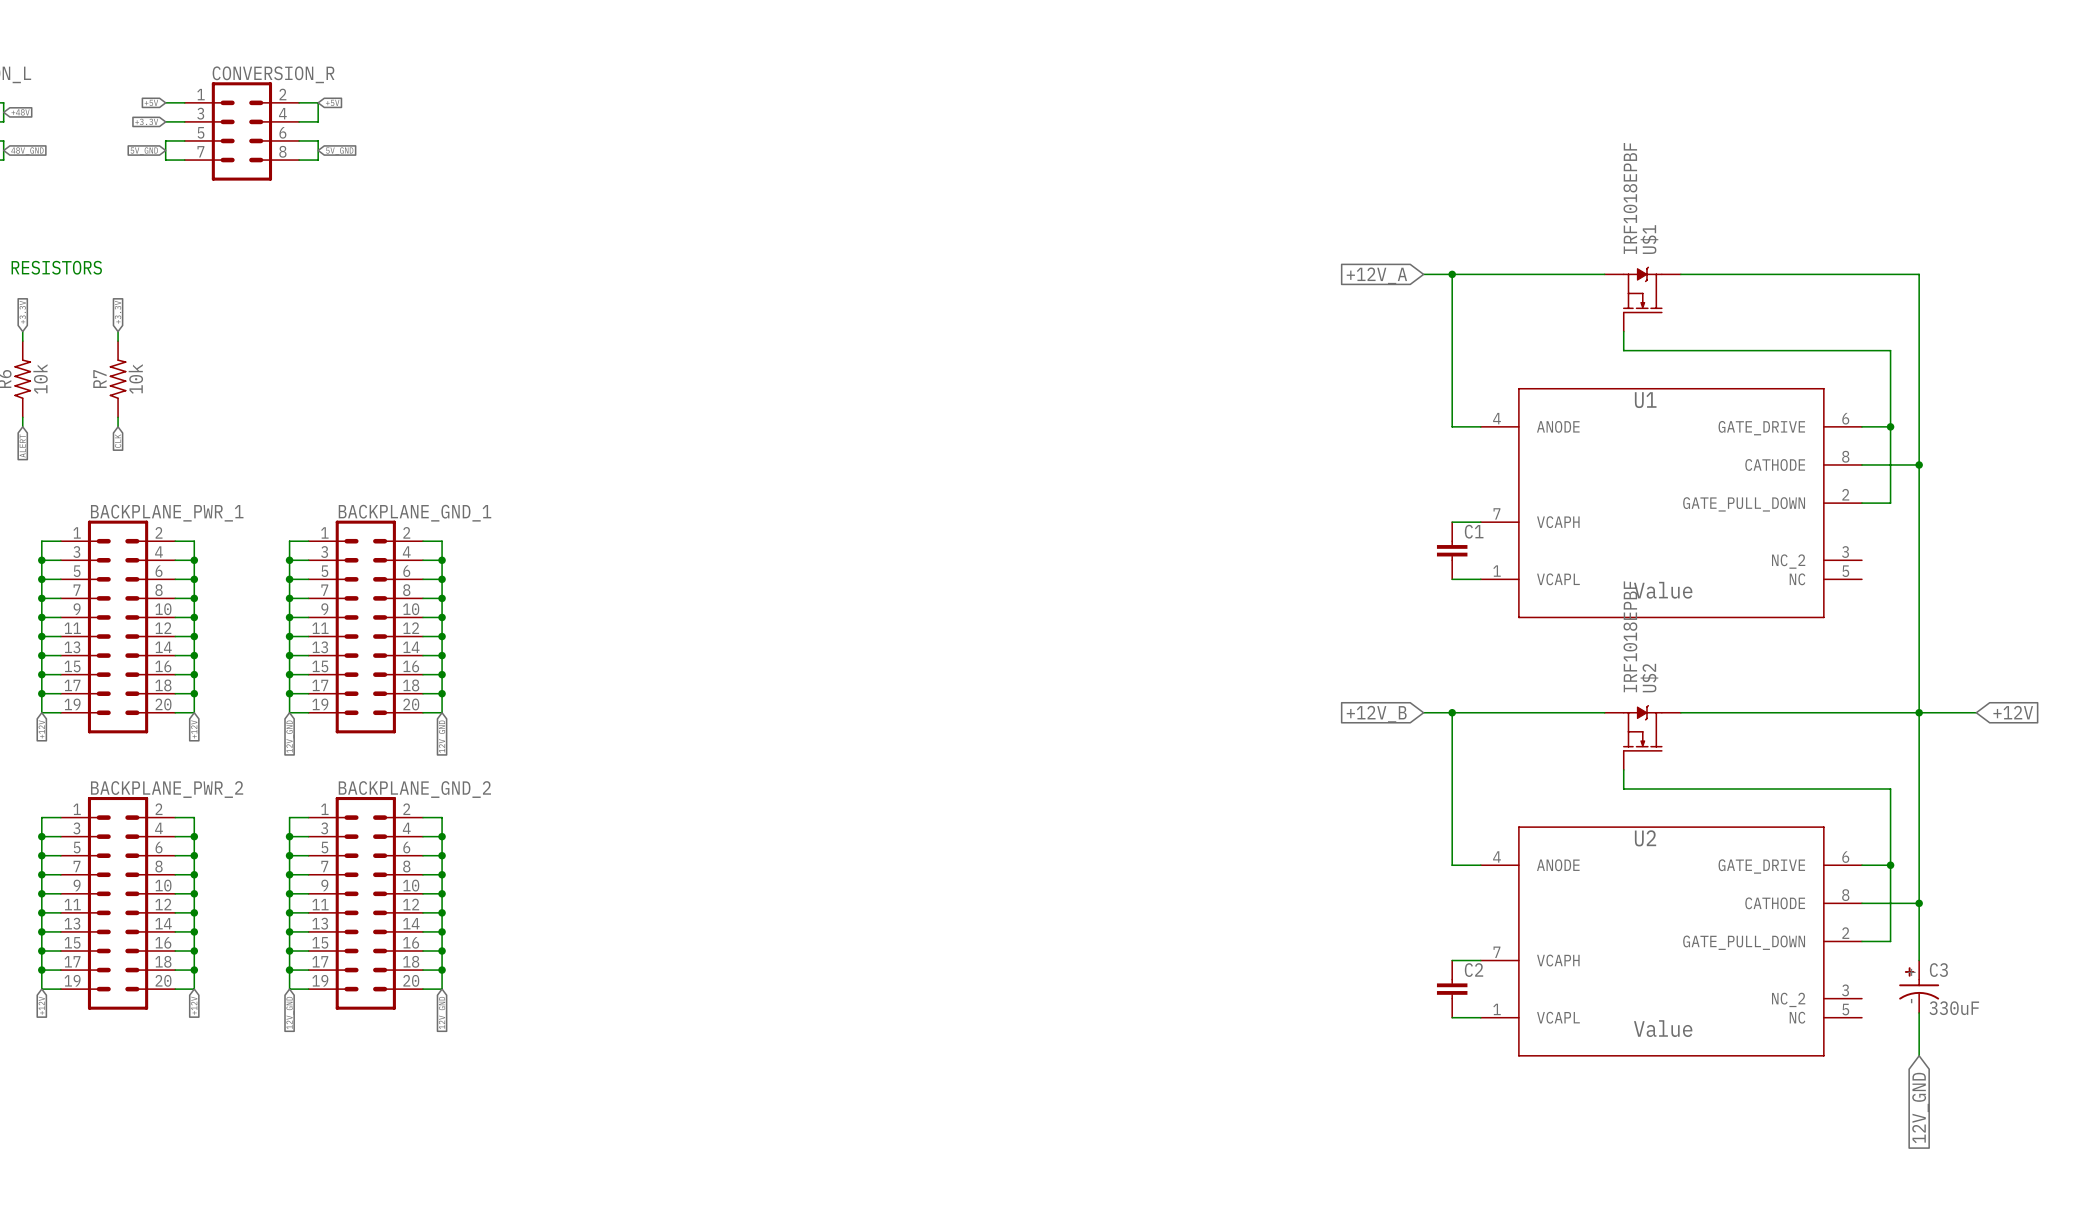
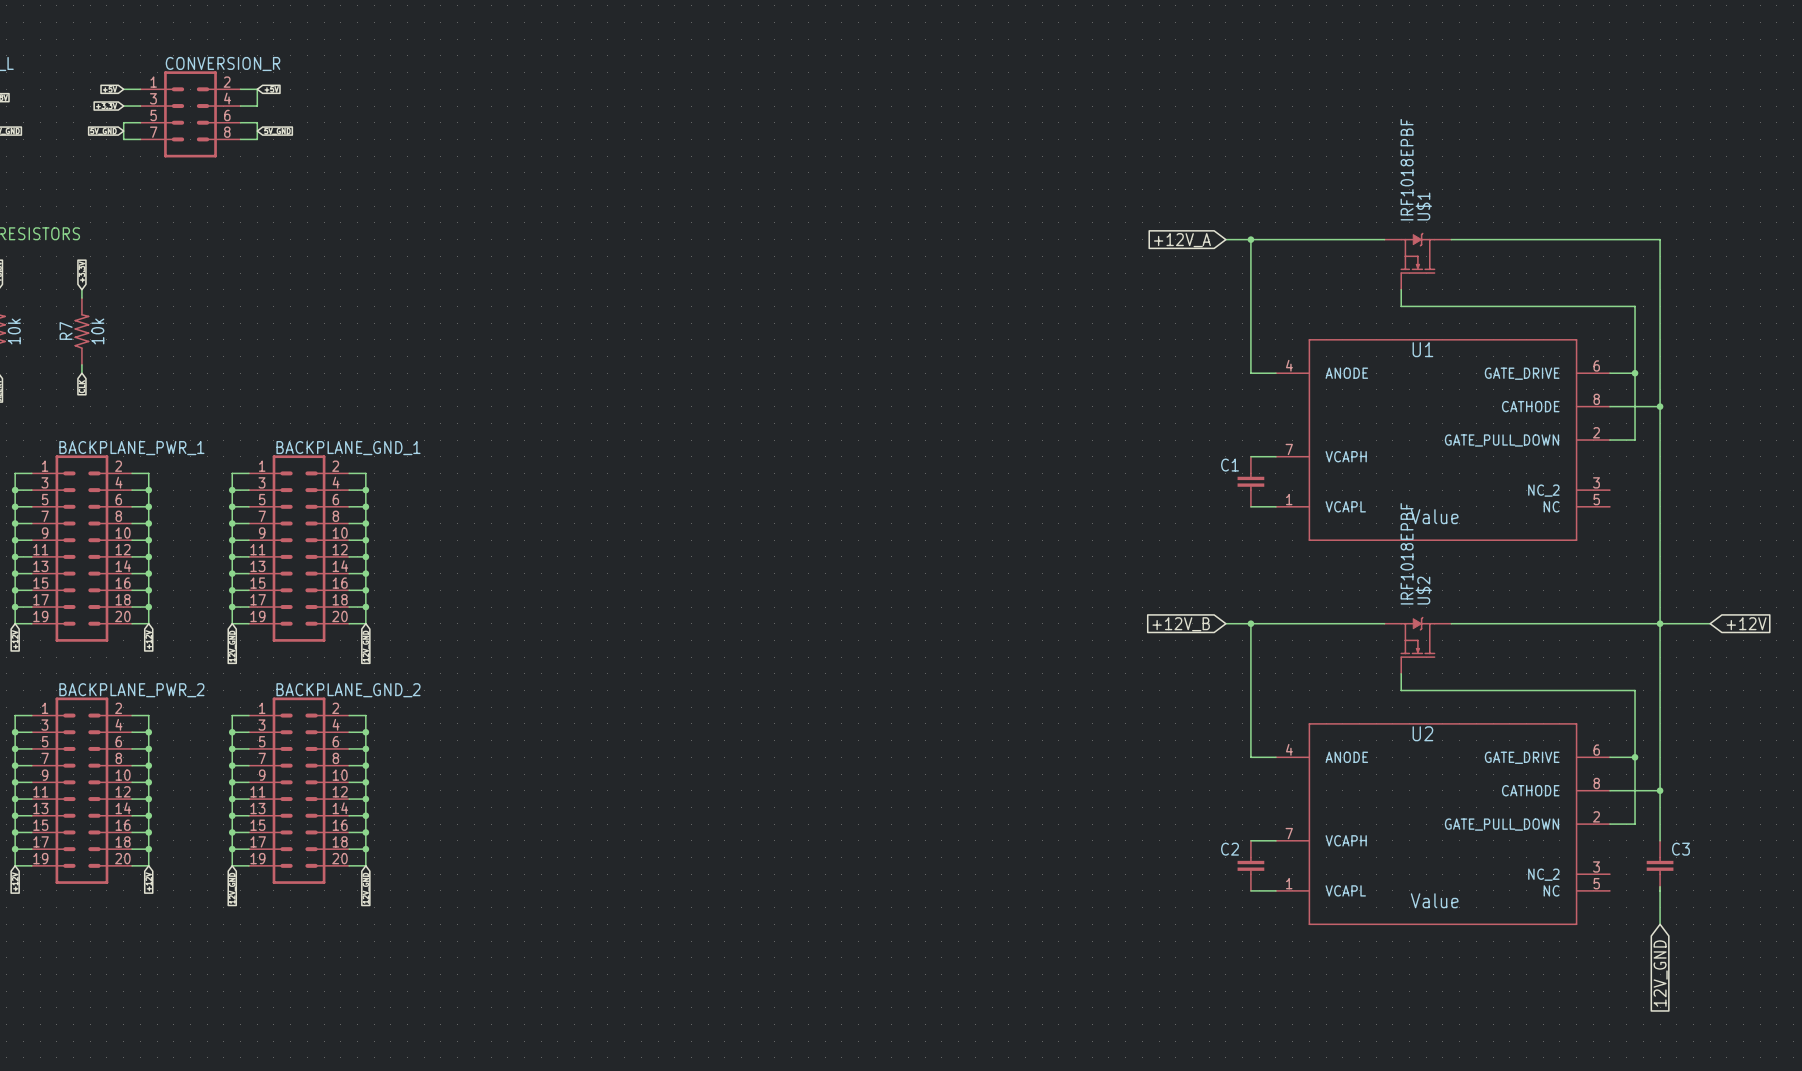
C1 name position: C1 (1474, 531) -> C1 (1230, 465)
C3 symbol: [1899, 960, 1940, 1013] -> [1646, 840, 1674, 891]
C2 name position: C2 (1474, 970) -> C2 (1230, 849)
C3 value: 330uF (1954, 1008) -> none

